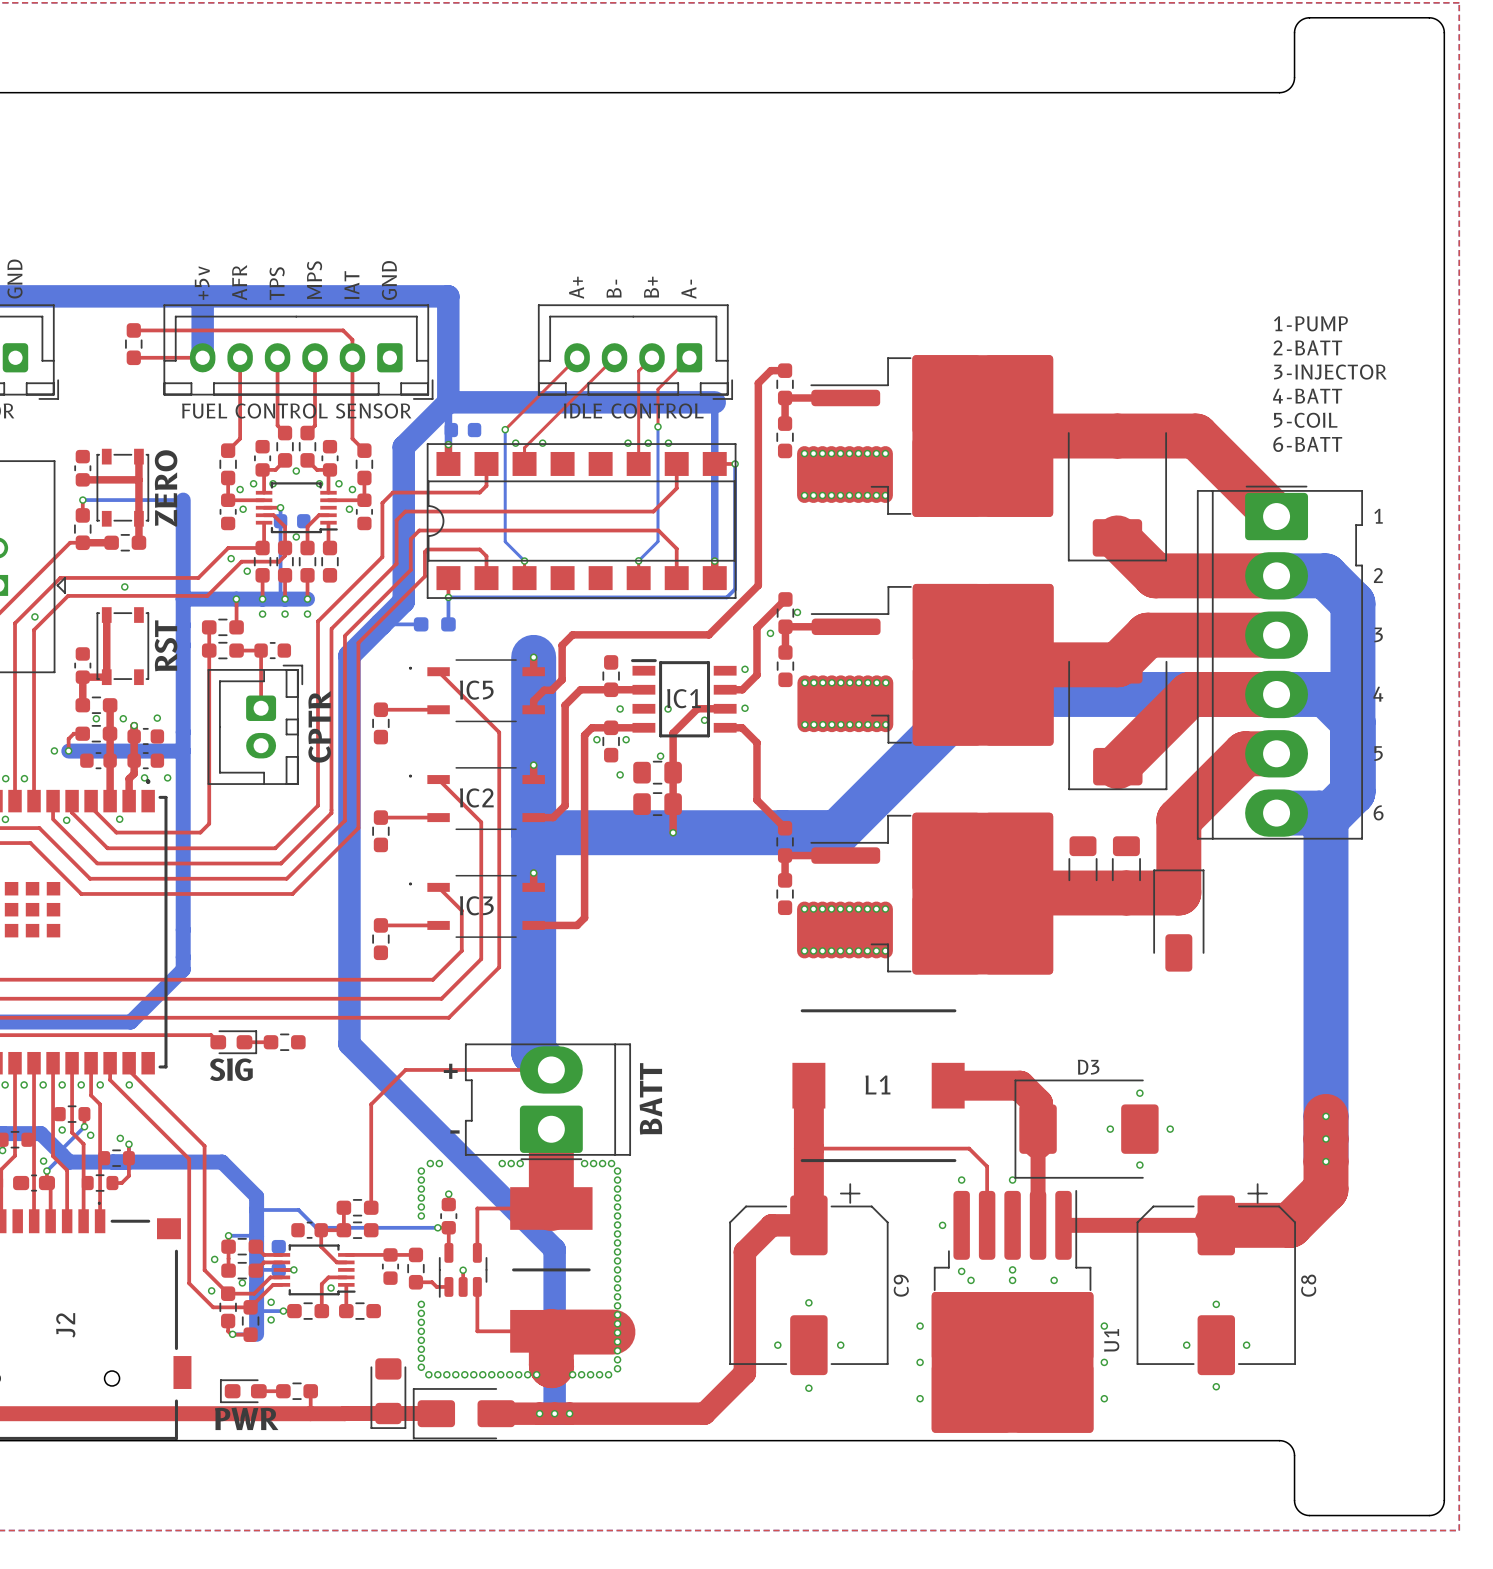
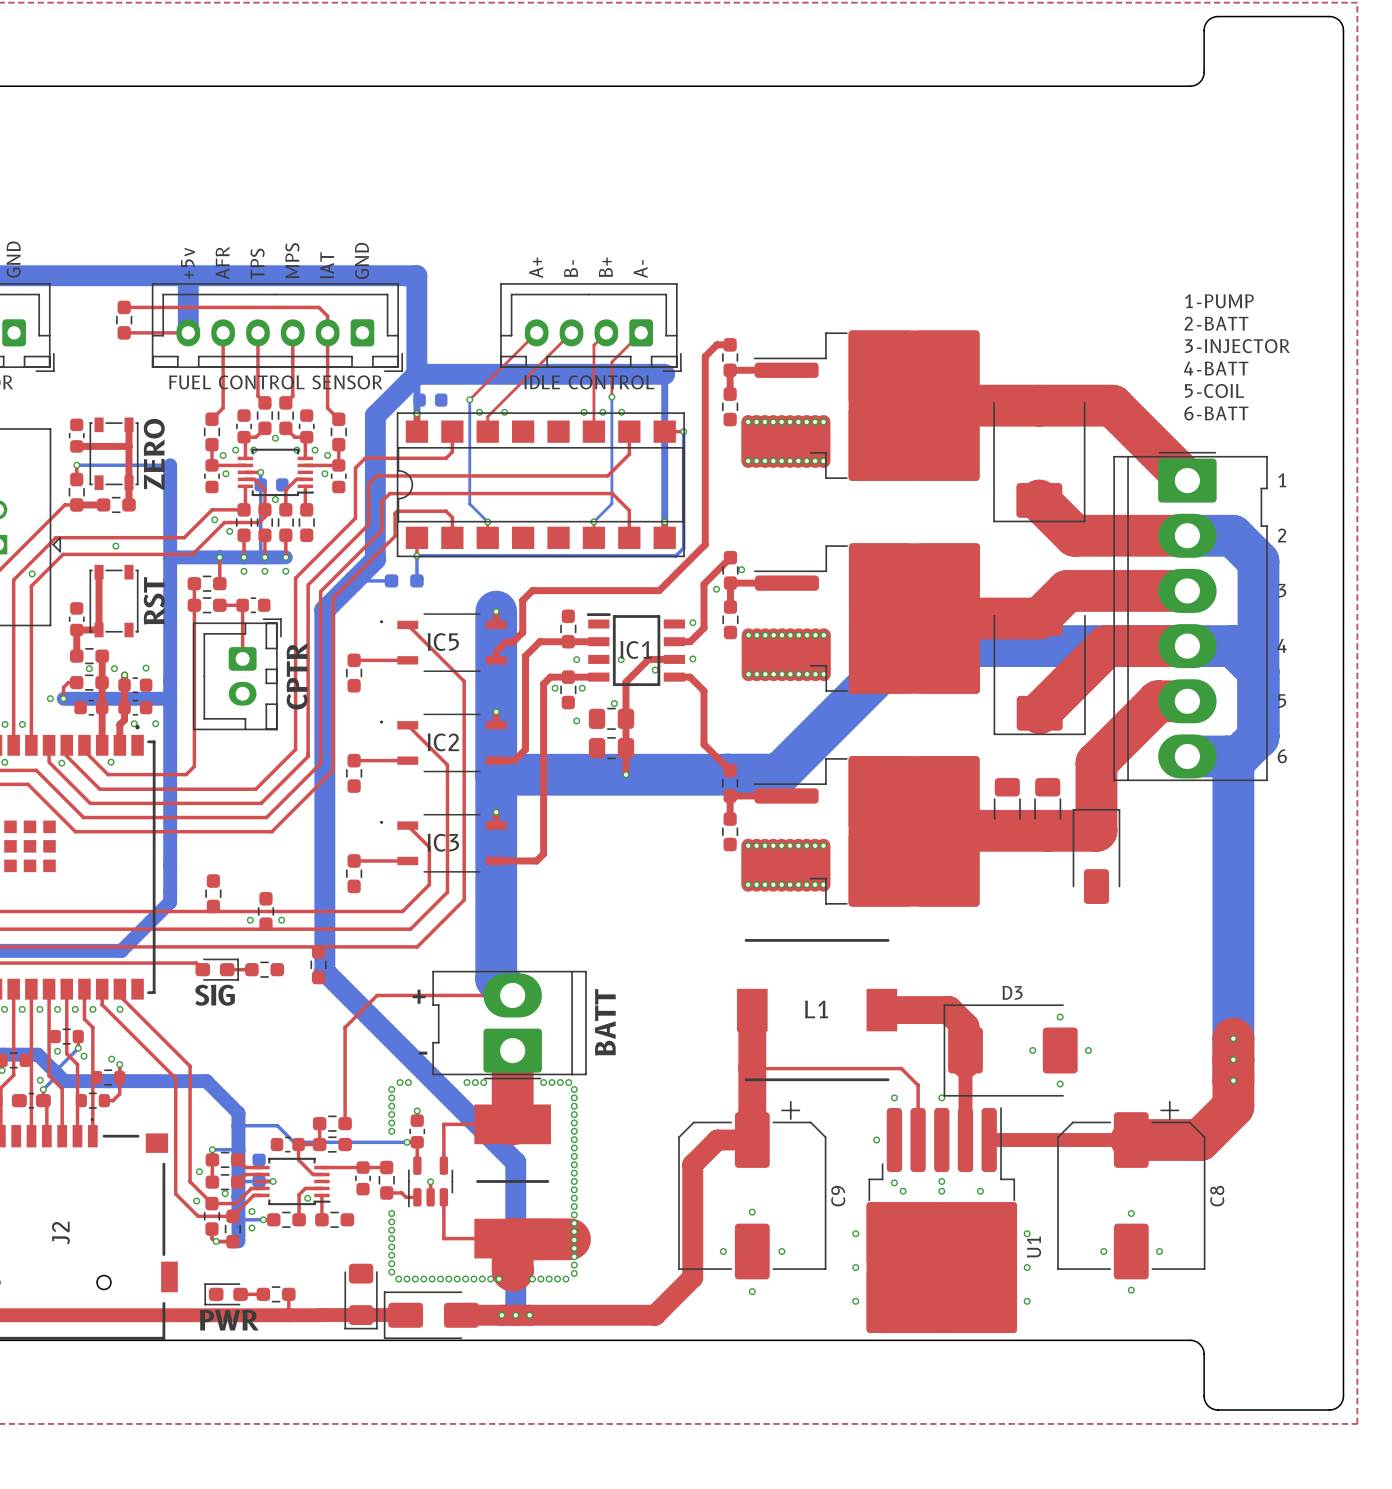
part: none -> (213, 893)
part: none -> (265, 911)
via: none -> (250, 920)
via: none -> (281, 920)
part: none -> (318, 964)

